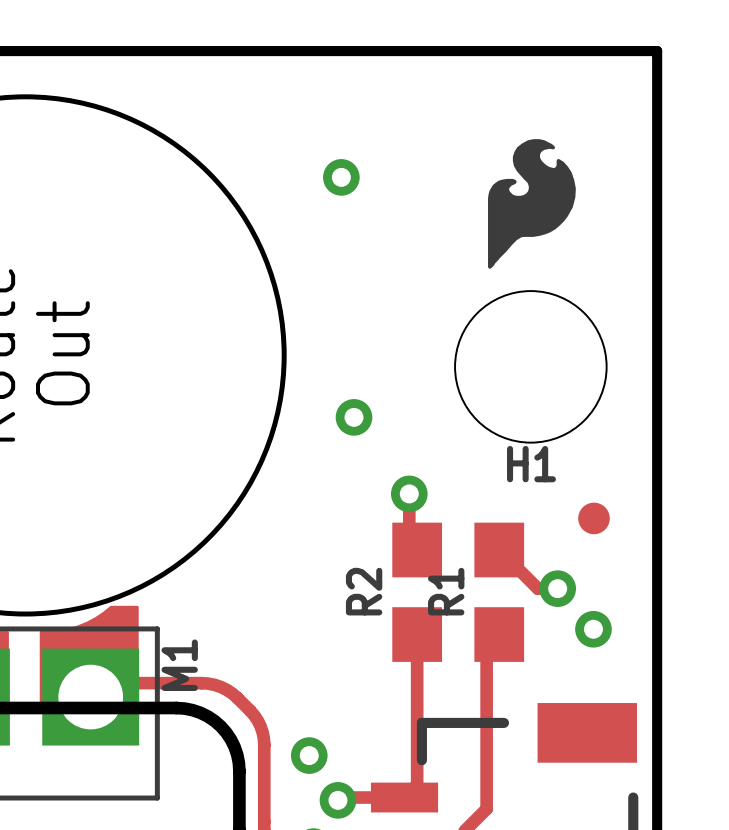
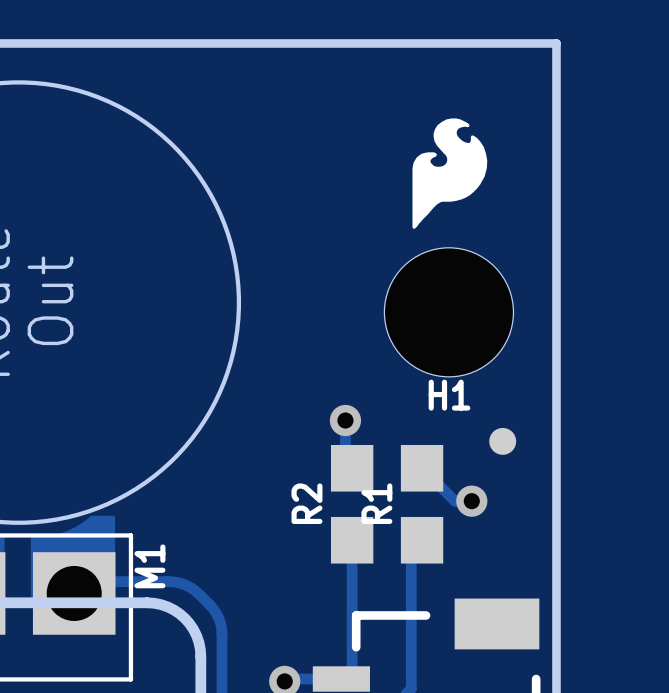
via: (341, 177) -> none
via: (353, 417) -> none
via: (593, 629) -> none
via: (309, 755) -> none

